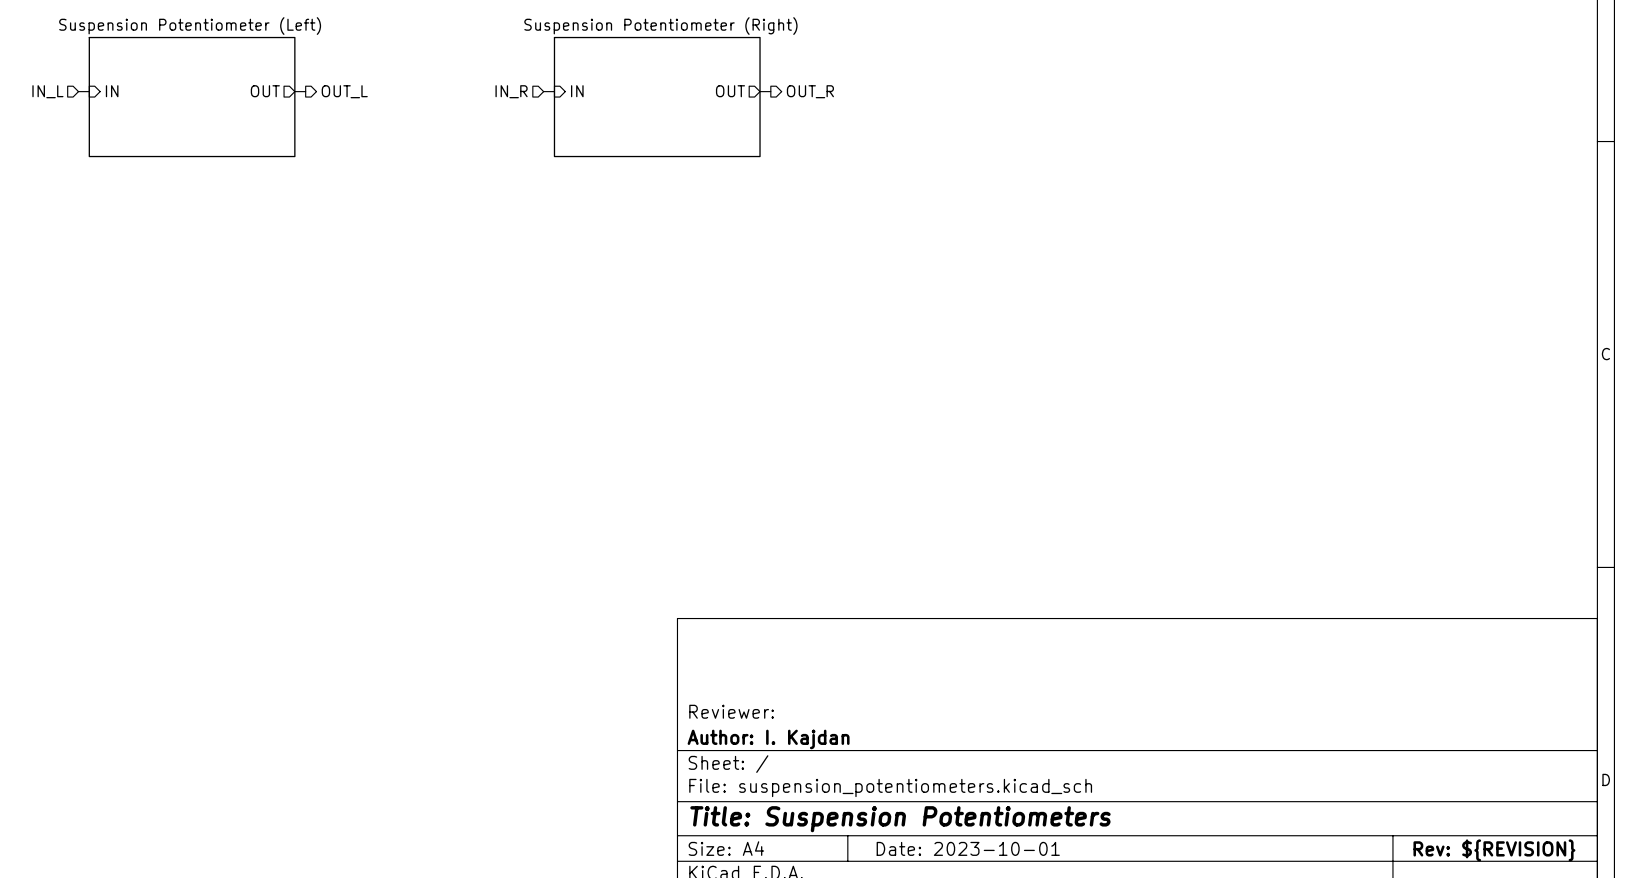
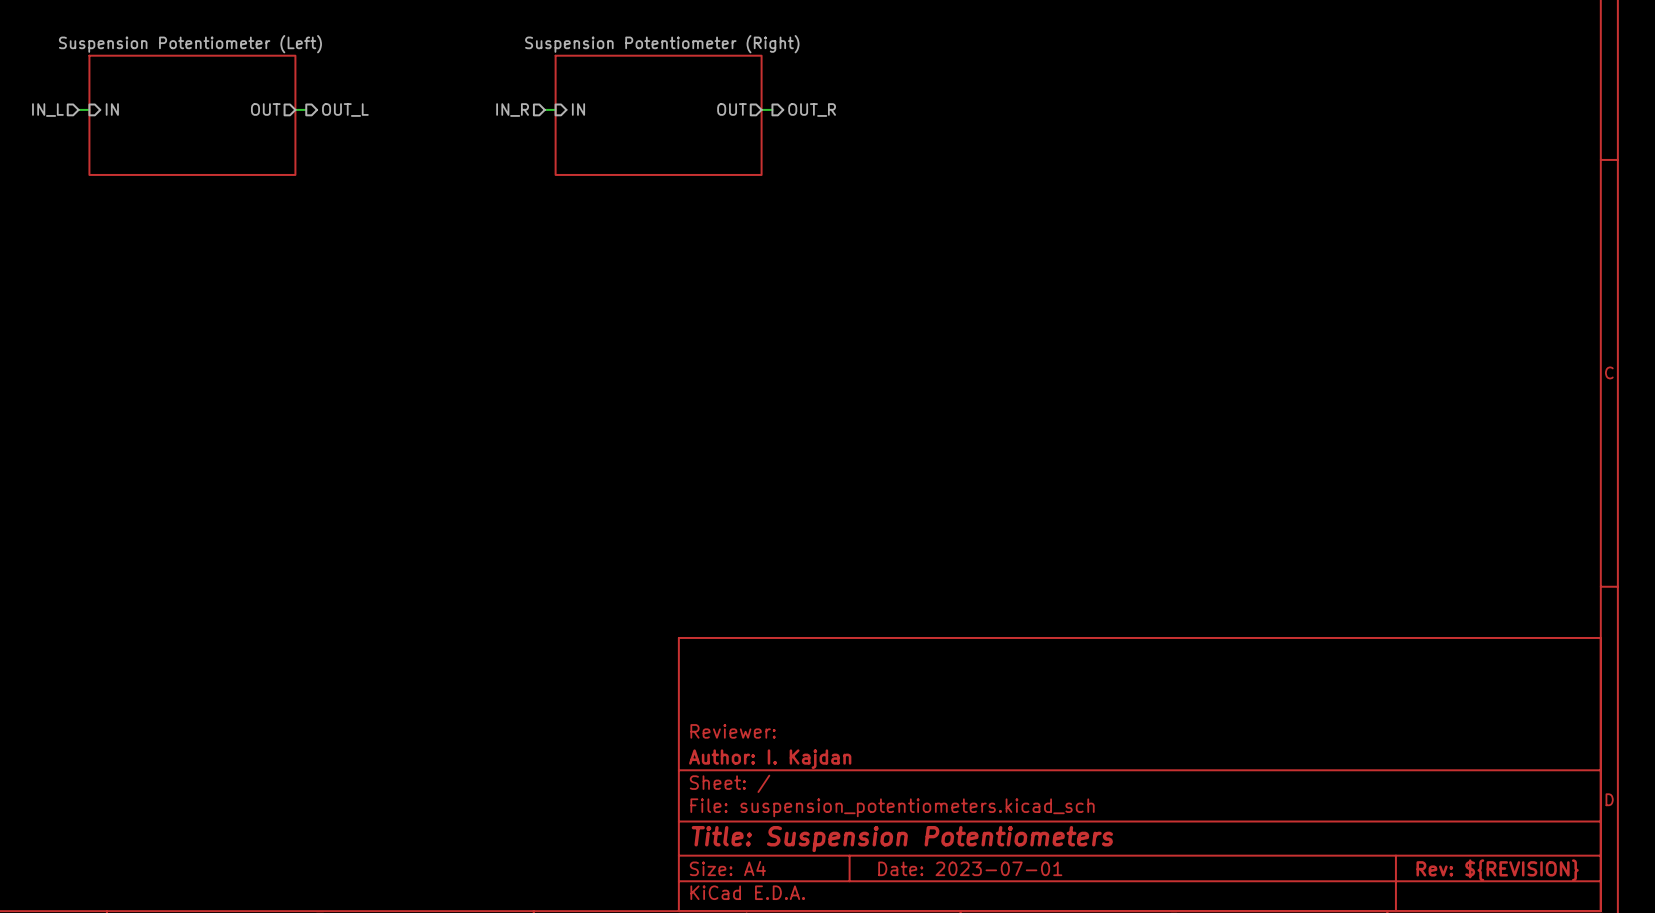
title block: Date: 2023-10-01 (968, 848) -> Date: 2023-07-01 (970, 868)

